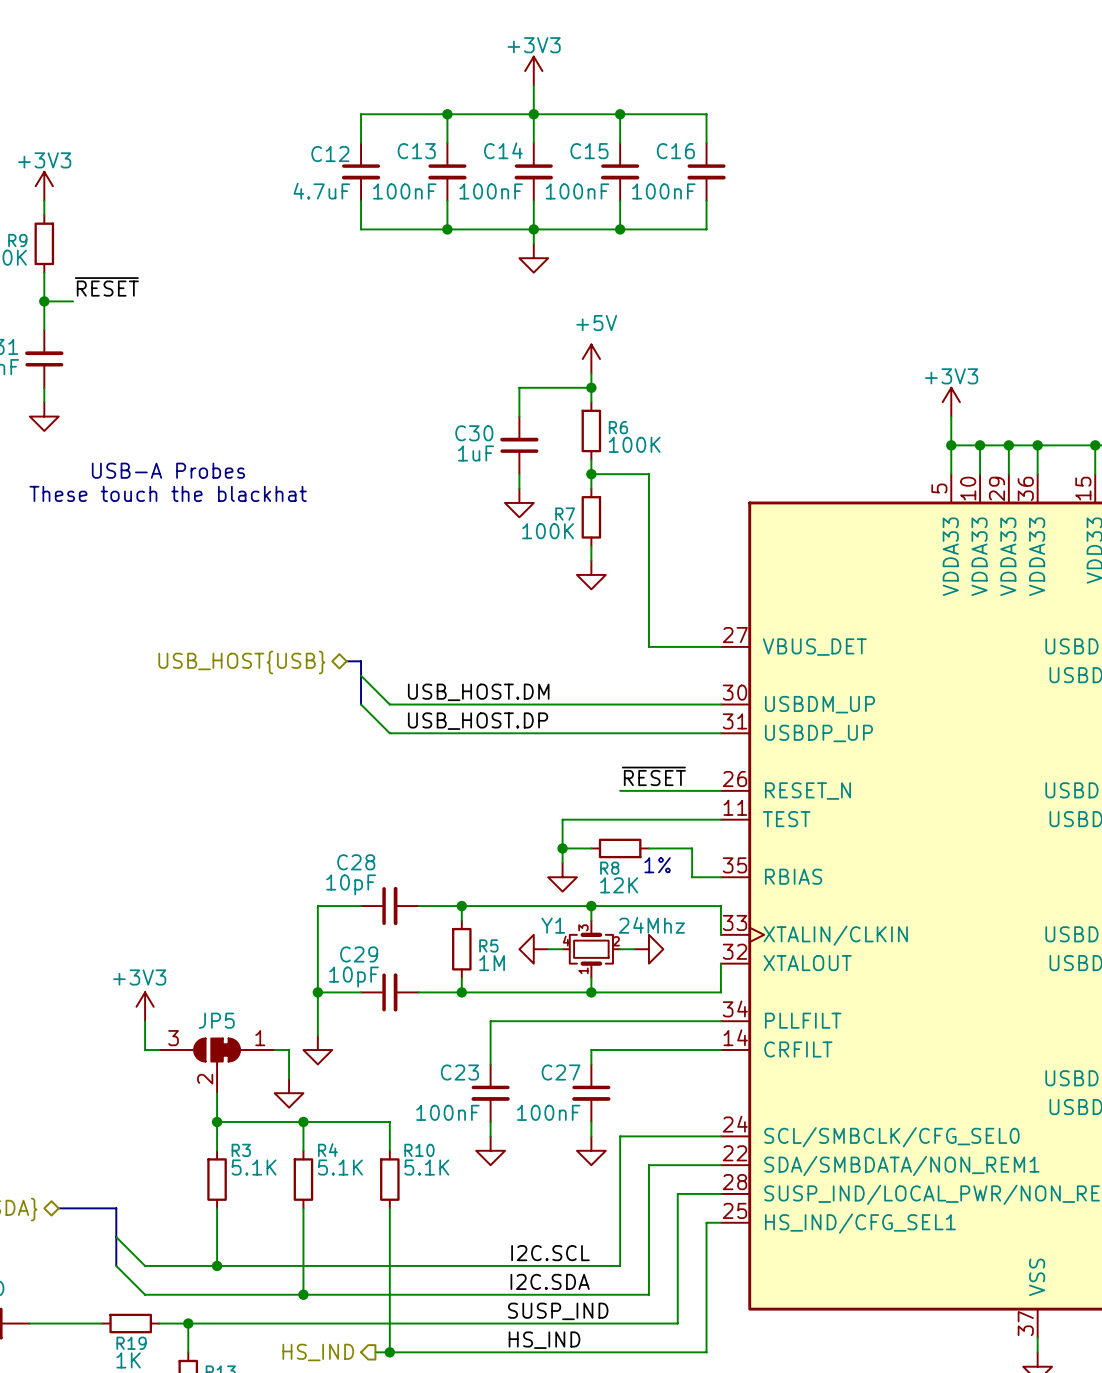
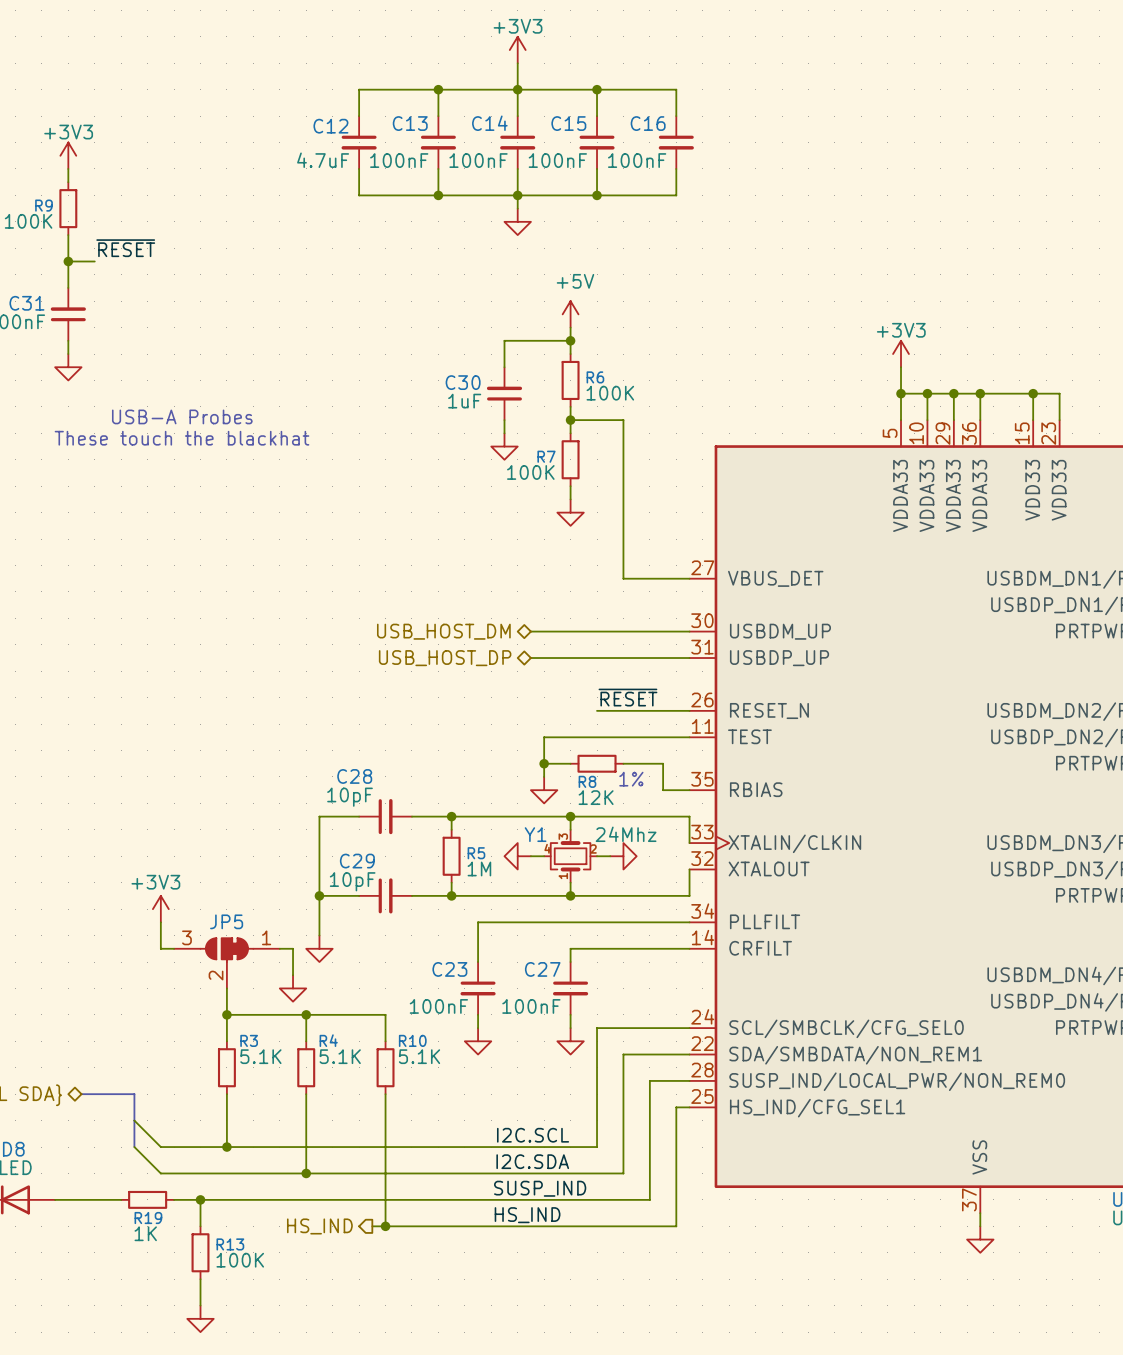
bus: (346, 661) (361, 661) (361, 704) -> none
hierarchical label: USB_HOST{USB} (241, 662) -> none
wire: (361, 675) (389, 704) (548, 704) -> none
label: USB_HOST.DM (478, 692) -> none
wire: (361, 704) (389, 733) (548, 733) -> none
hierarchical label: none -> USB_HOST_DM (443, 631)
label: USB_HOST.DP (478, 721) -> none
hierarchical label: none -> USB_HOST_DP (445, 658)

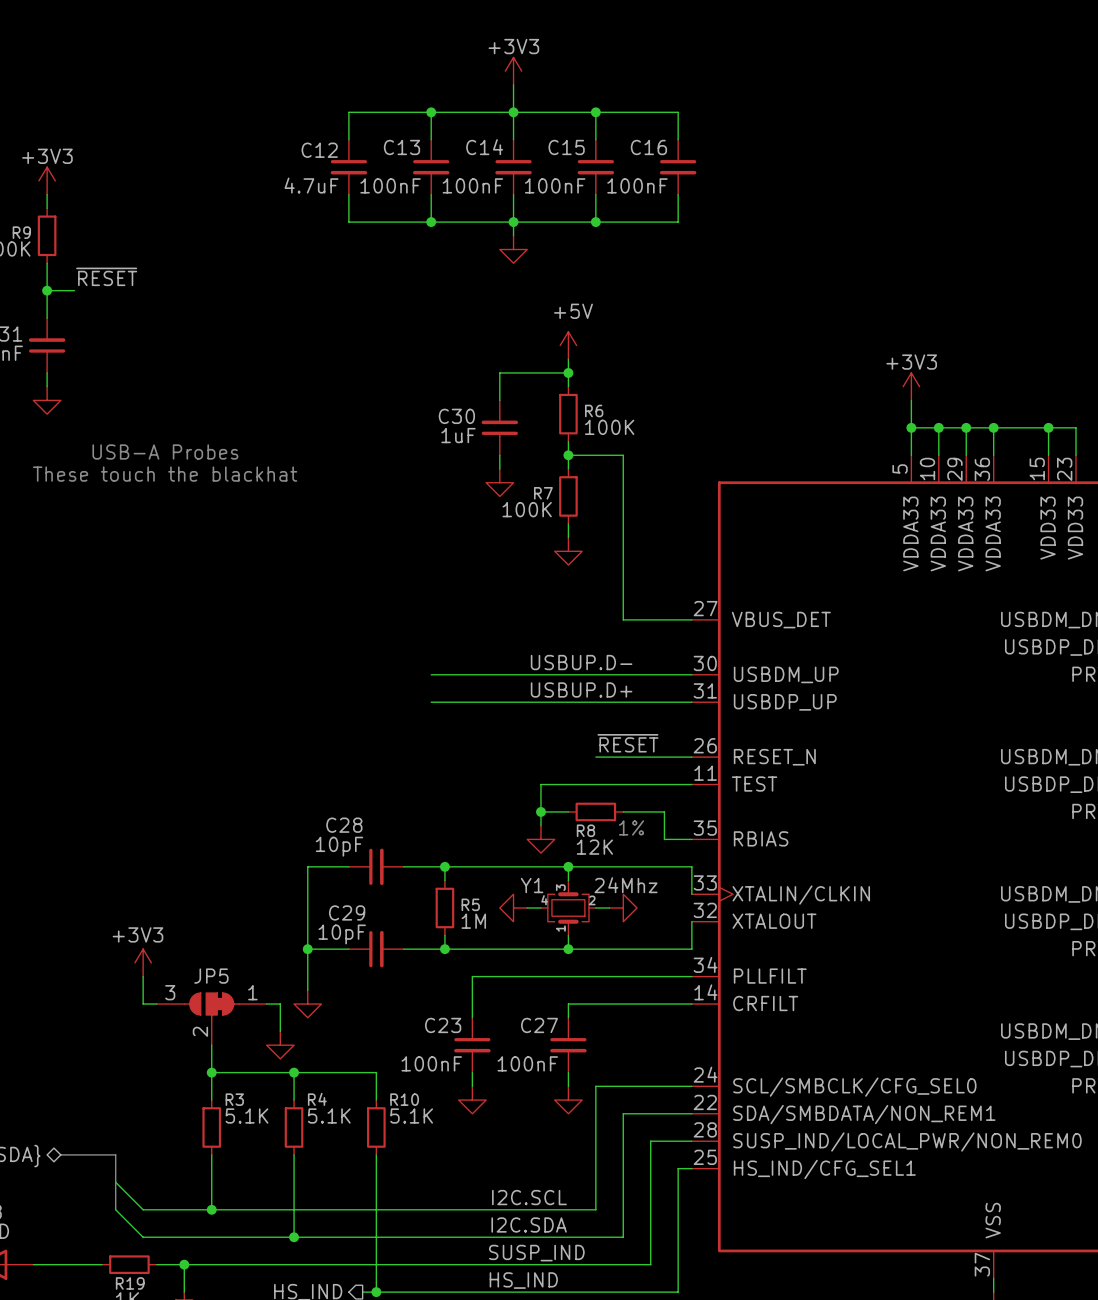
label: none -> USBUP.D- (581, 662)
wire: none -> (431, 674) (527, 674)
hierarchical label: USB_HOST_DM (443, 631) -> none
label: none -> USBUP.D+ (581, 689)
wire: none -> (431, 702) (527, 702)
hierarchical label: USB_HOST_DP (445, 658) -> none

